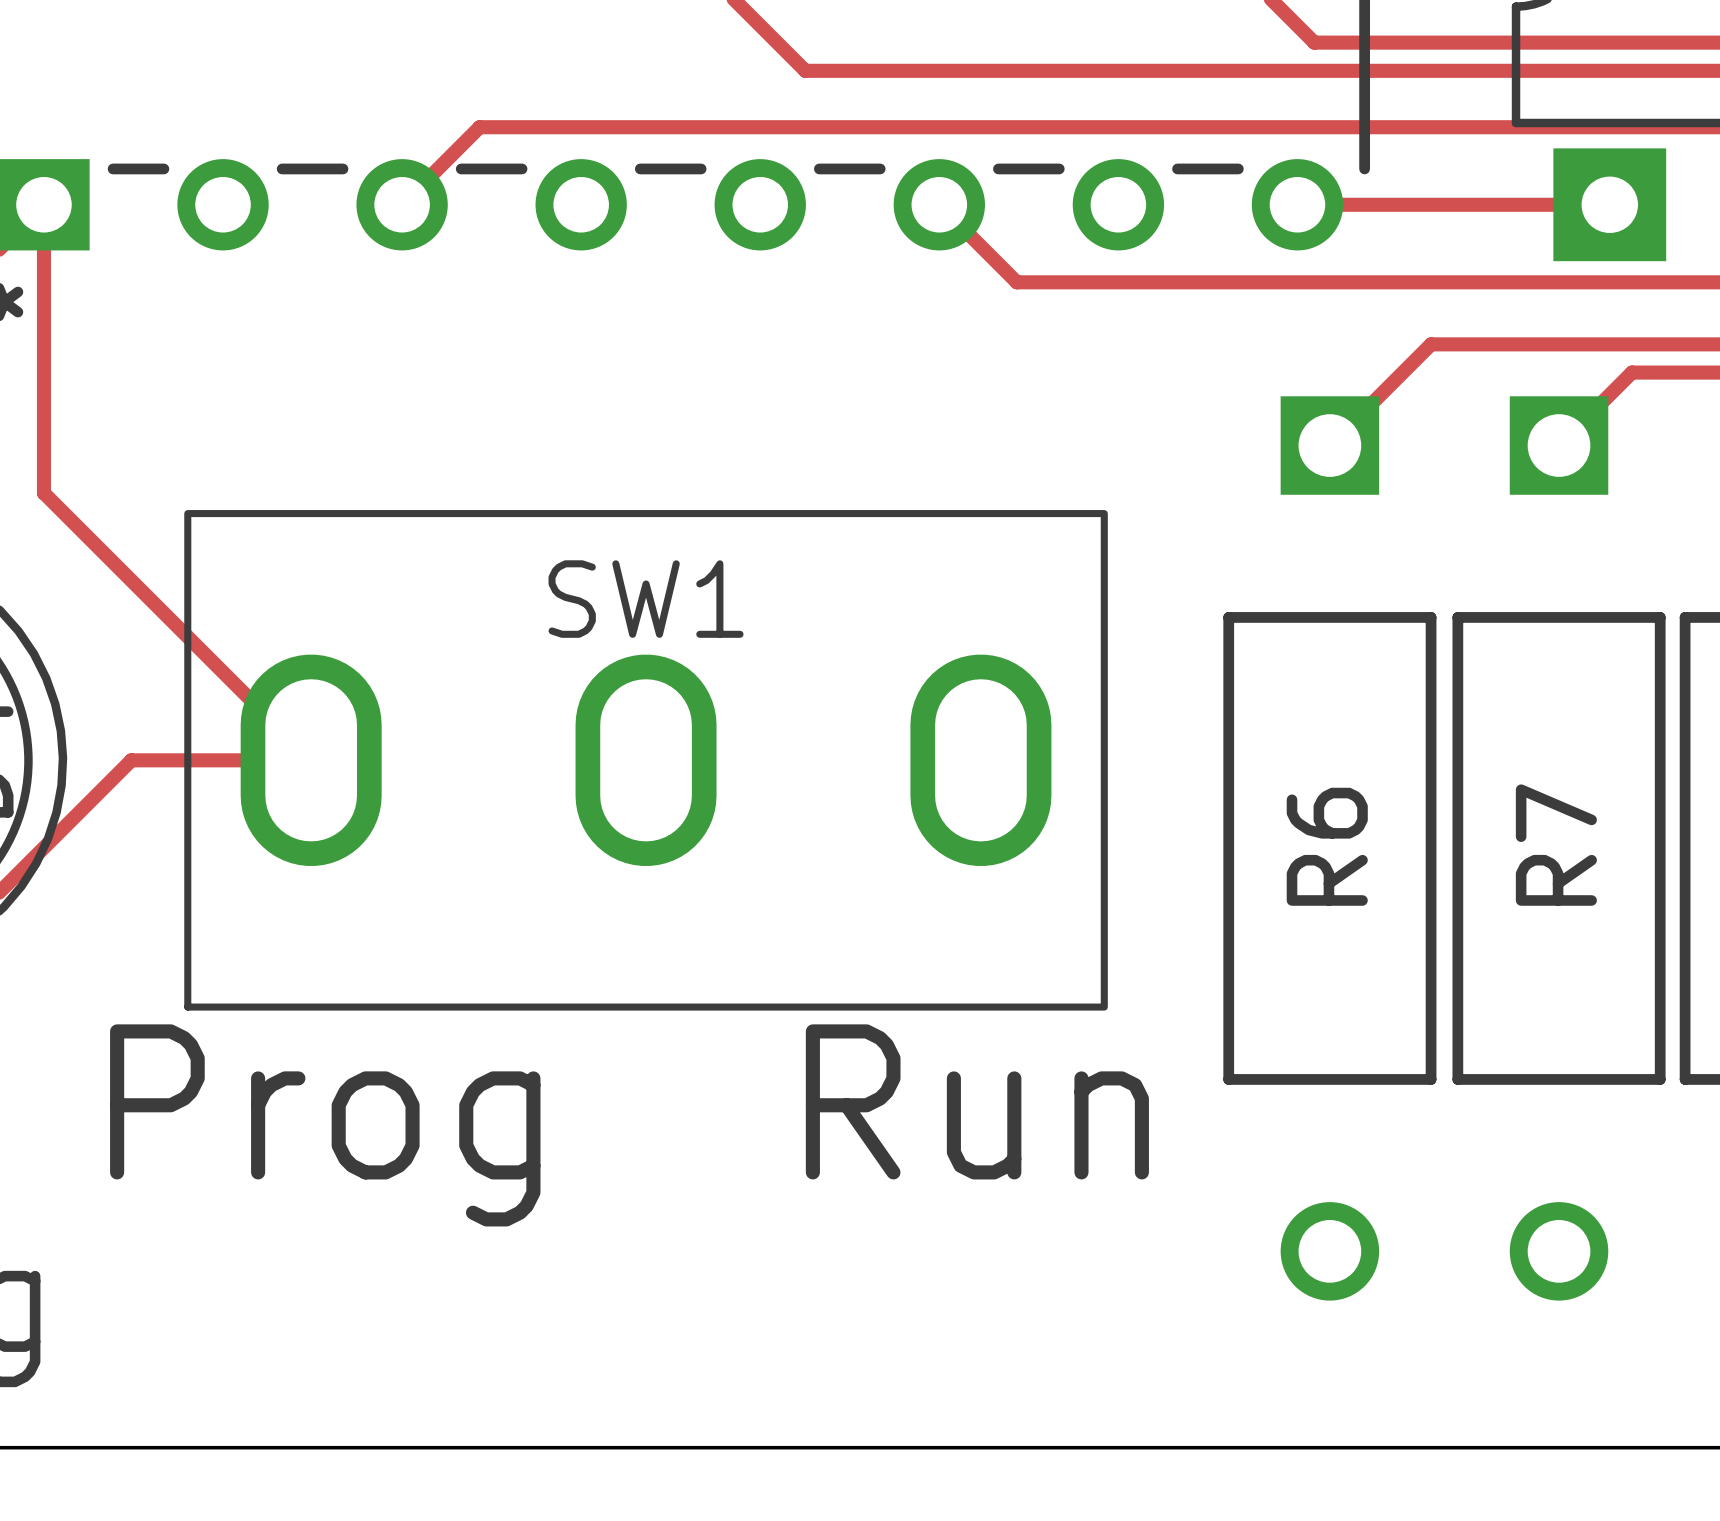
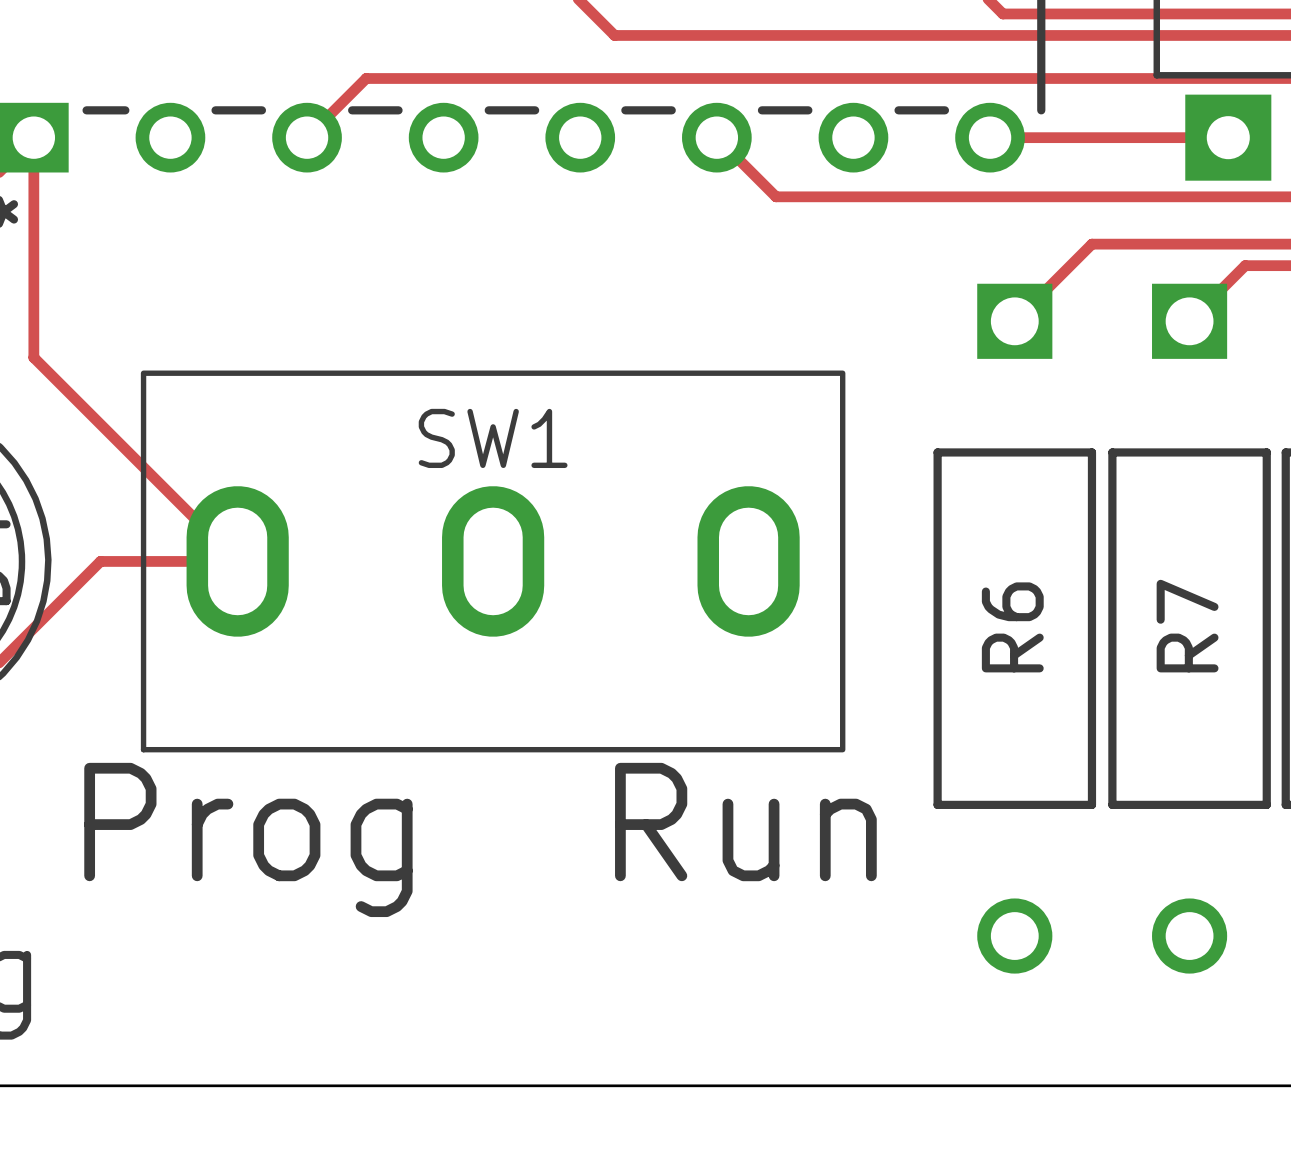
SW1 footprint: [184, 510, 1108, 1011] -> [140, 370, 846, 753]

